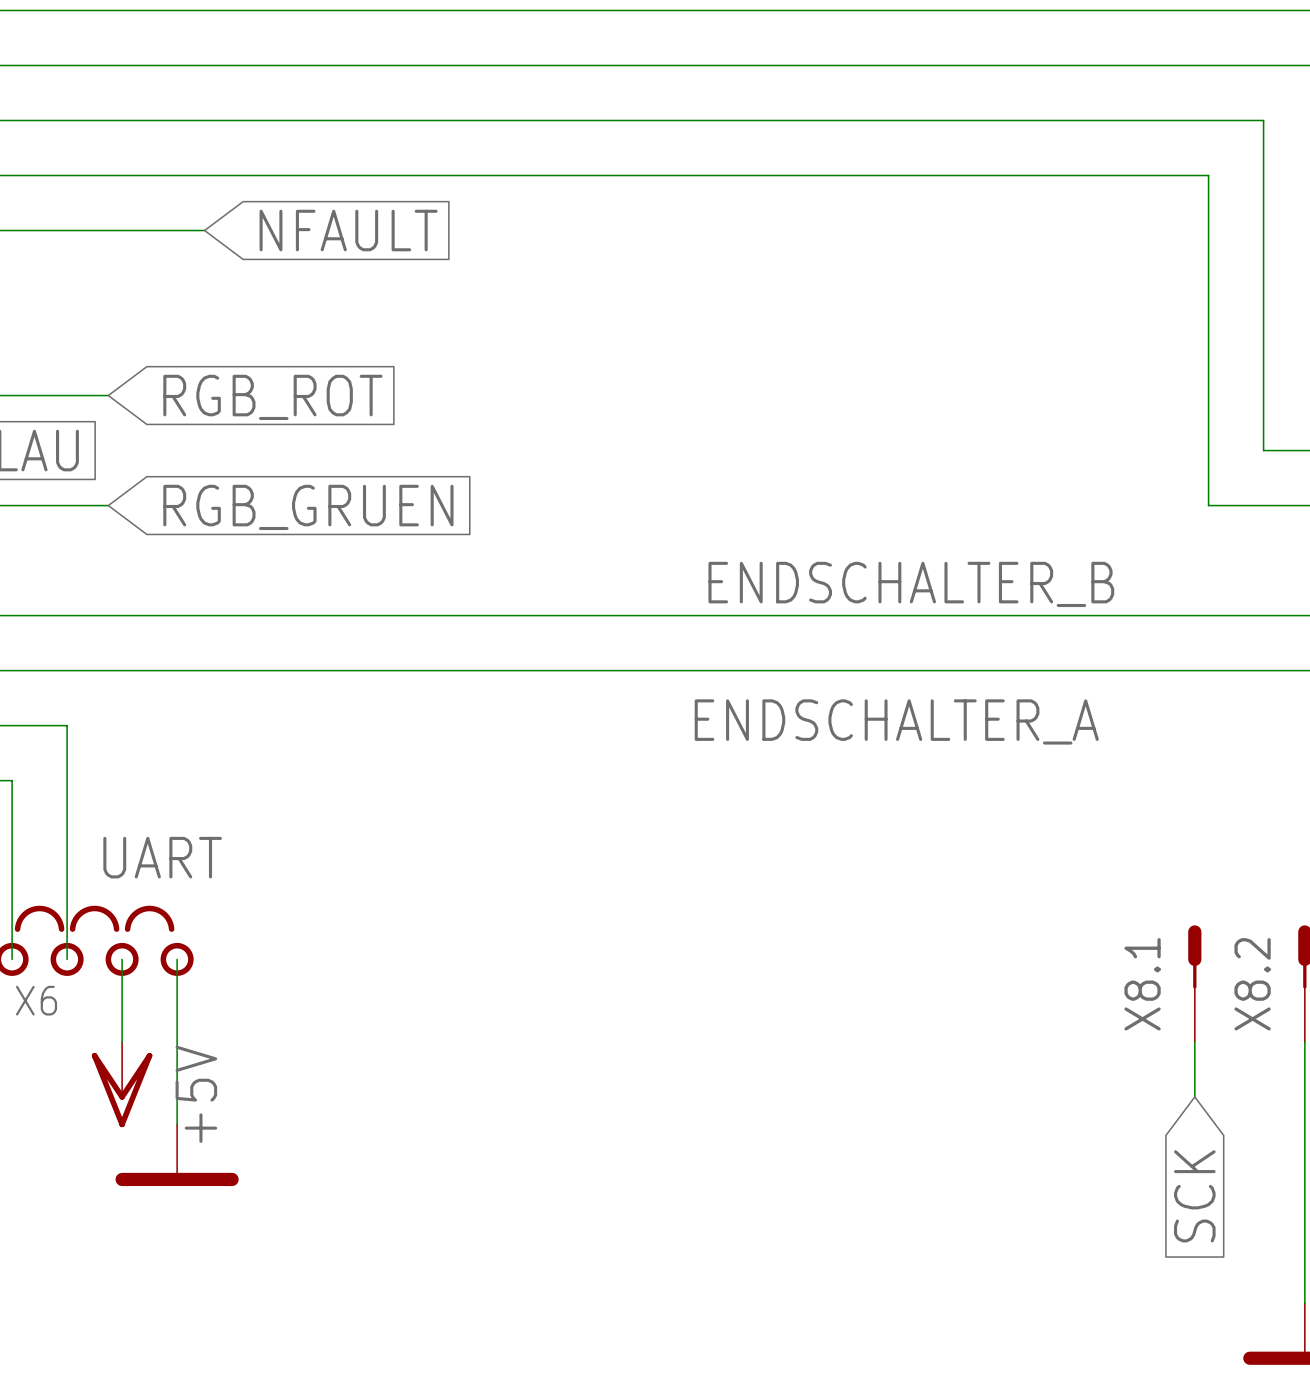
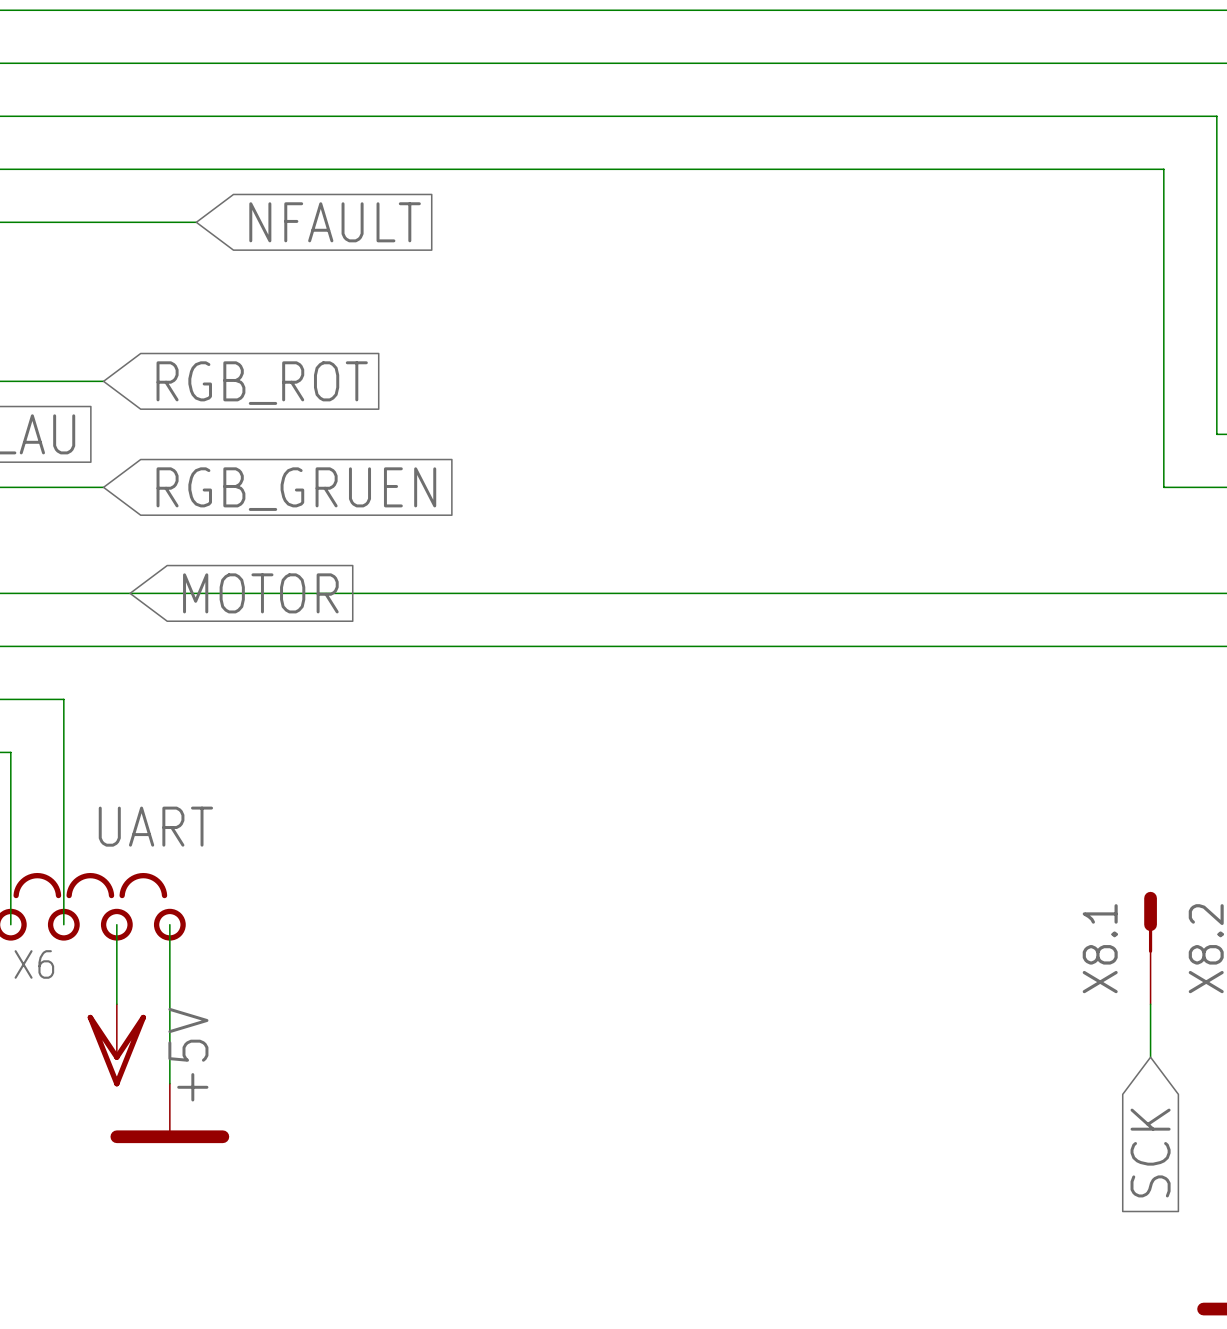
label: ENDSCHALTER_B (911, 584) -> none
global label: none -> MOTOR (260, 593)
label: ENDSCHALTER_A (896, 721) -> none

